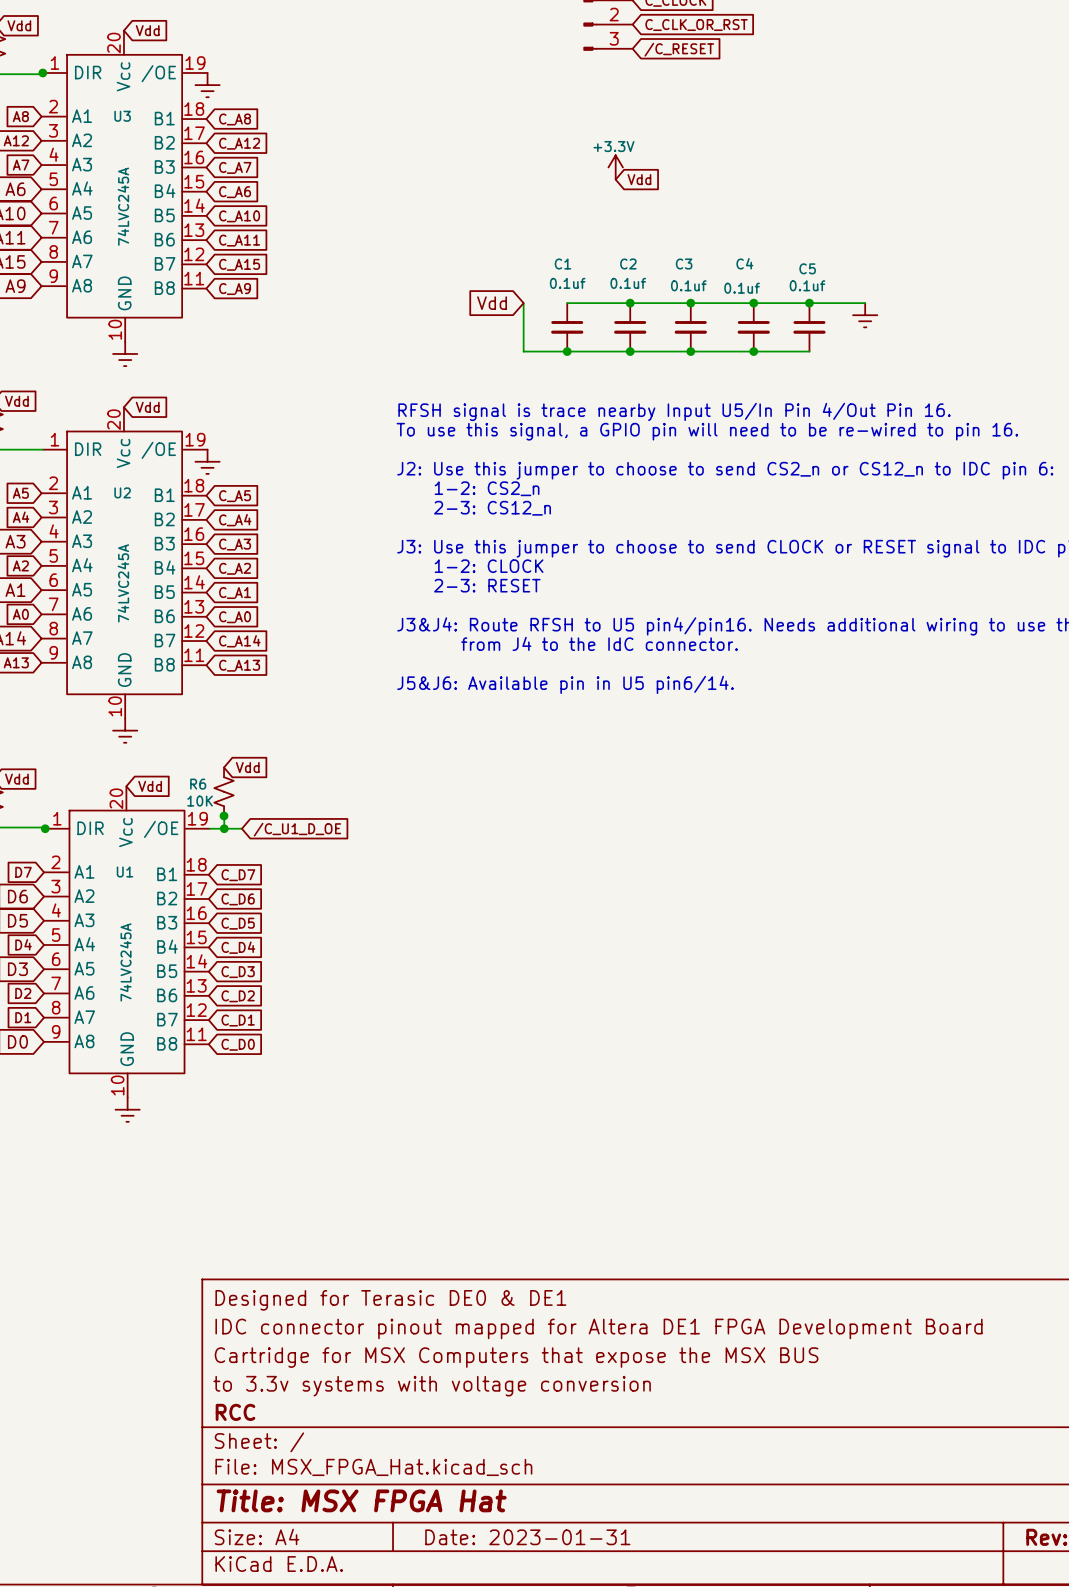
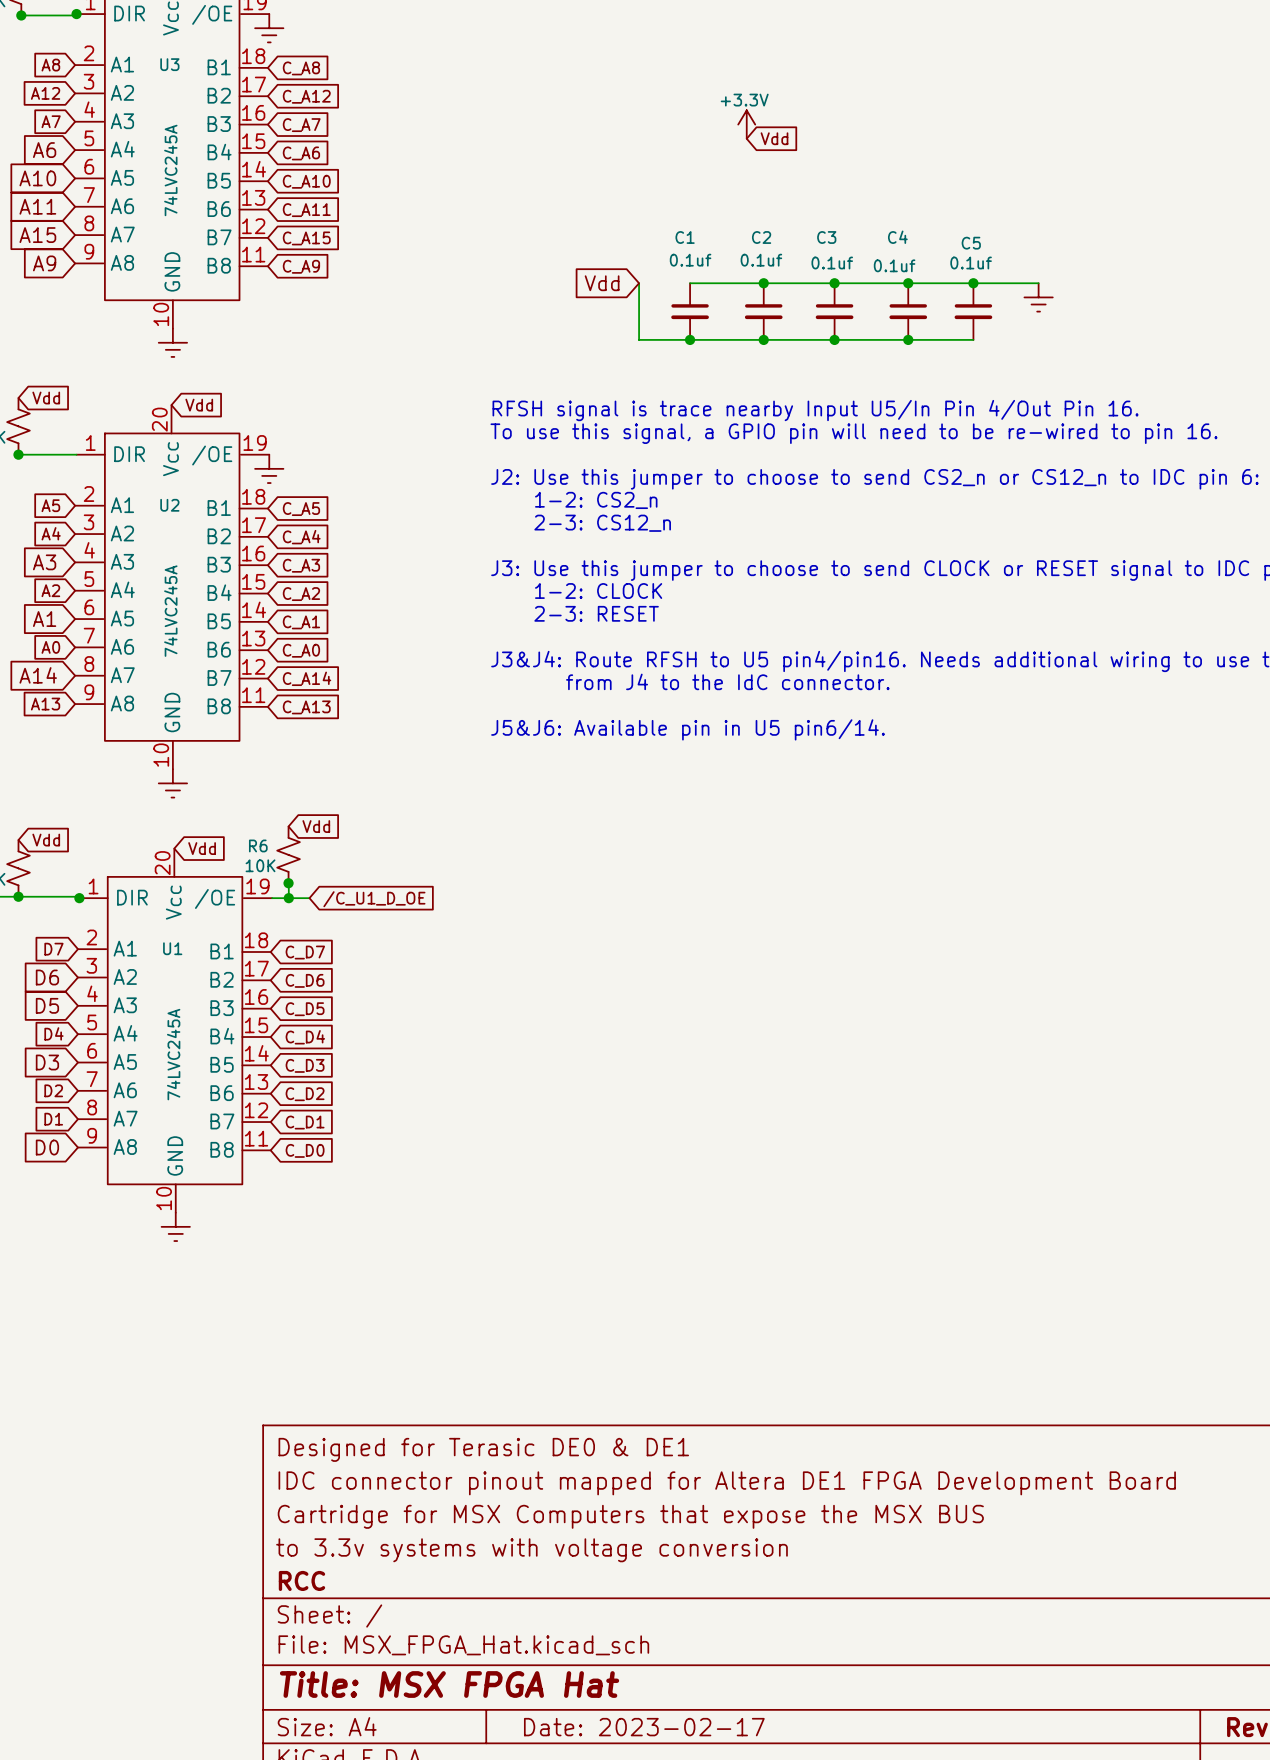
title block: Date: 2023-01-31 (527, 1537) -> Date: 2023-02-17 (644, 1727)

